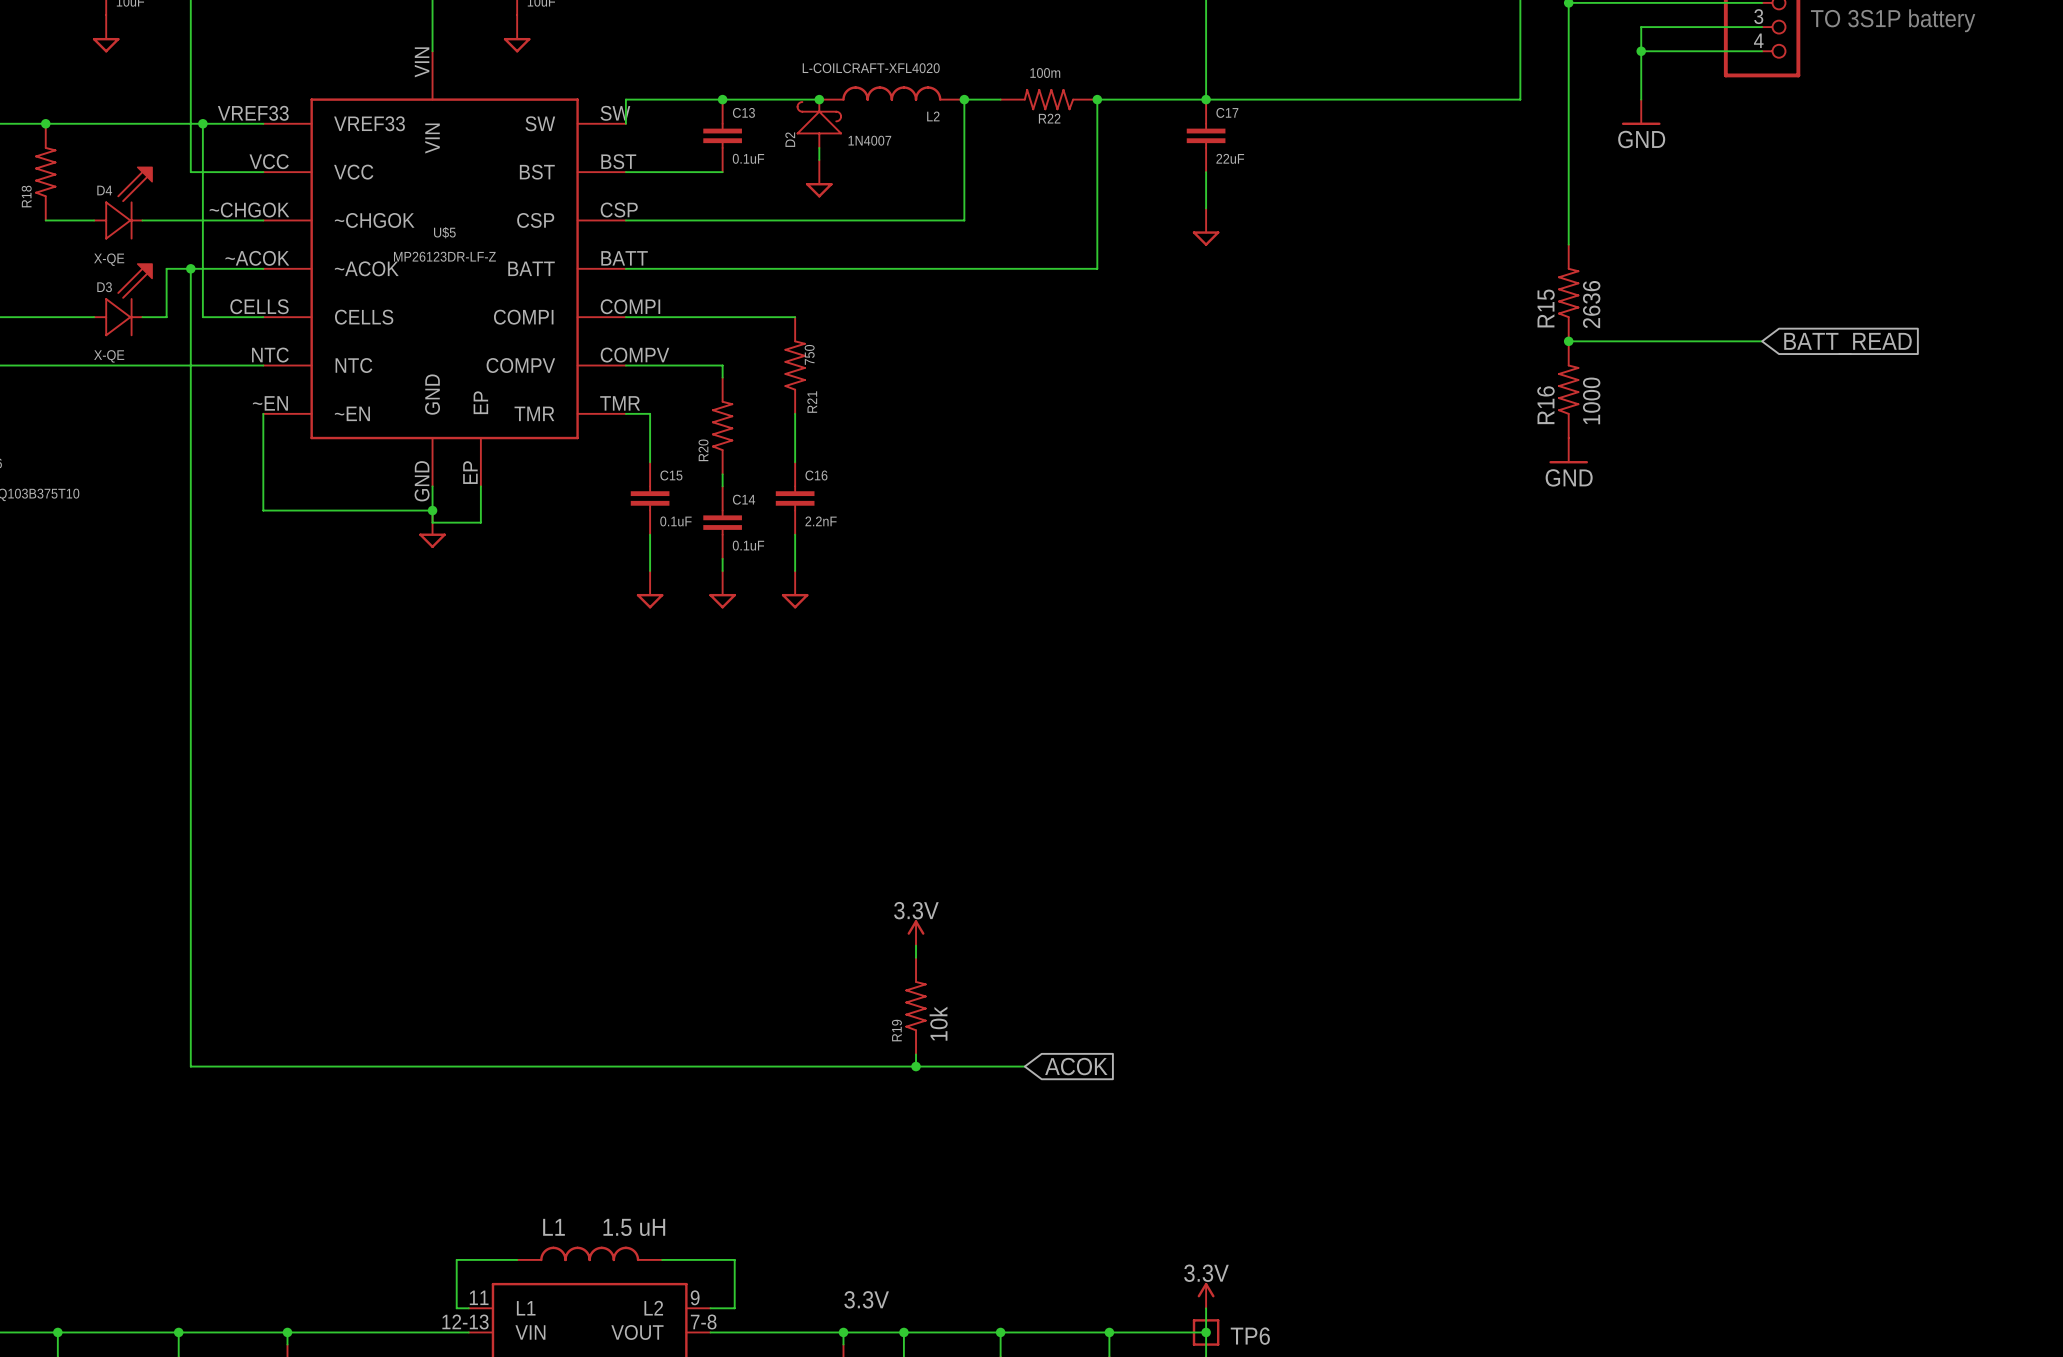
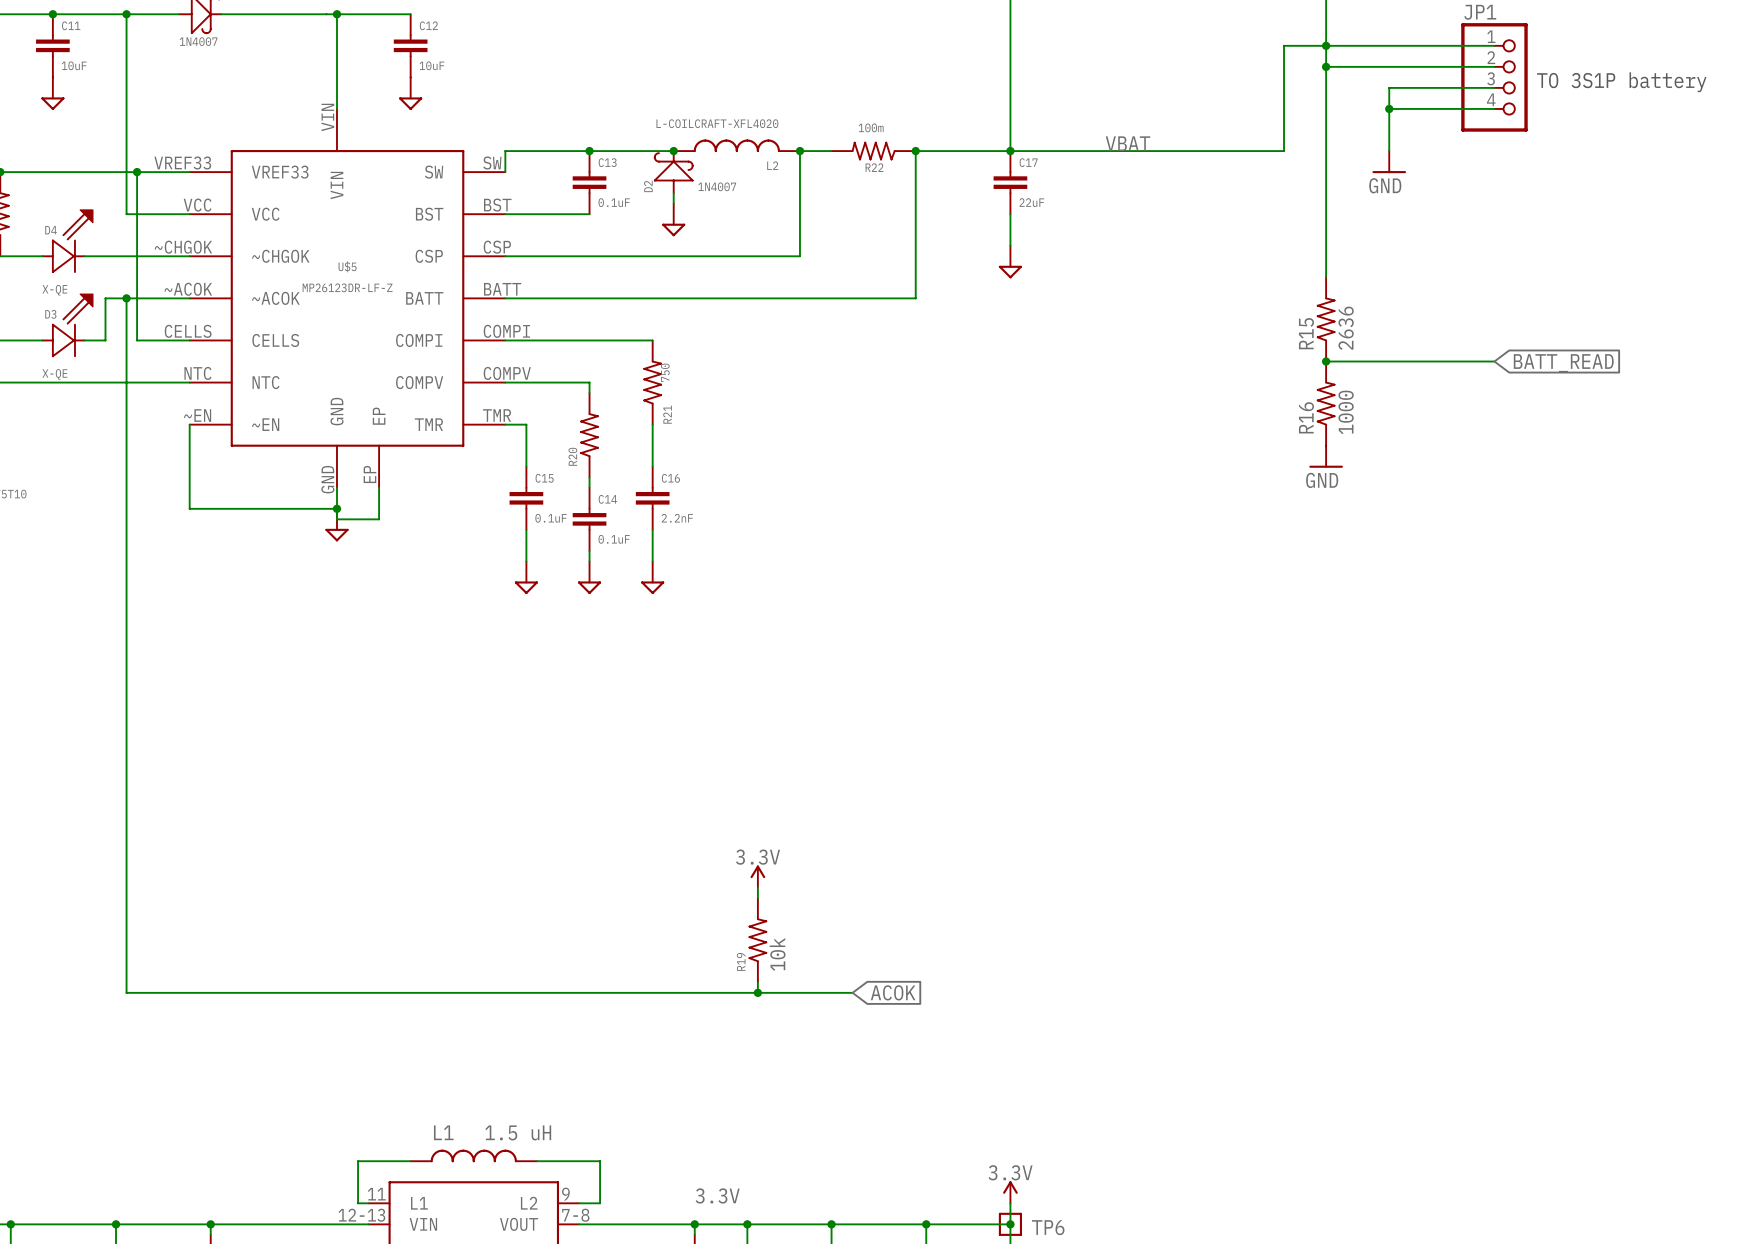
label: none -> VBAT (1128, 143)

